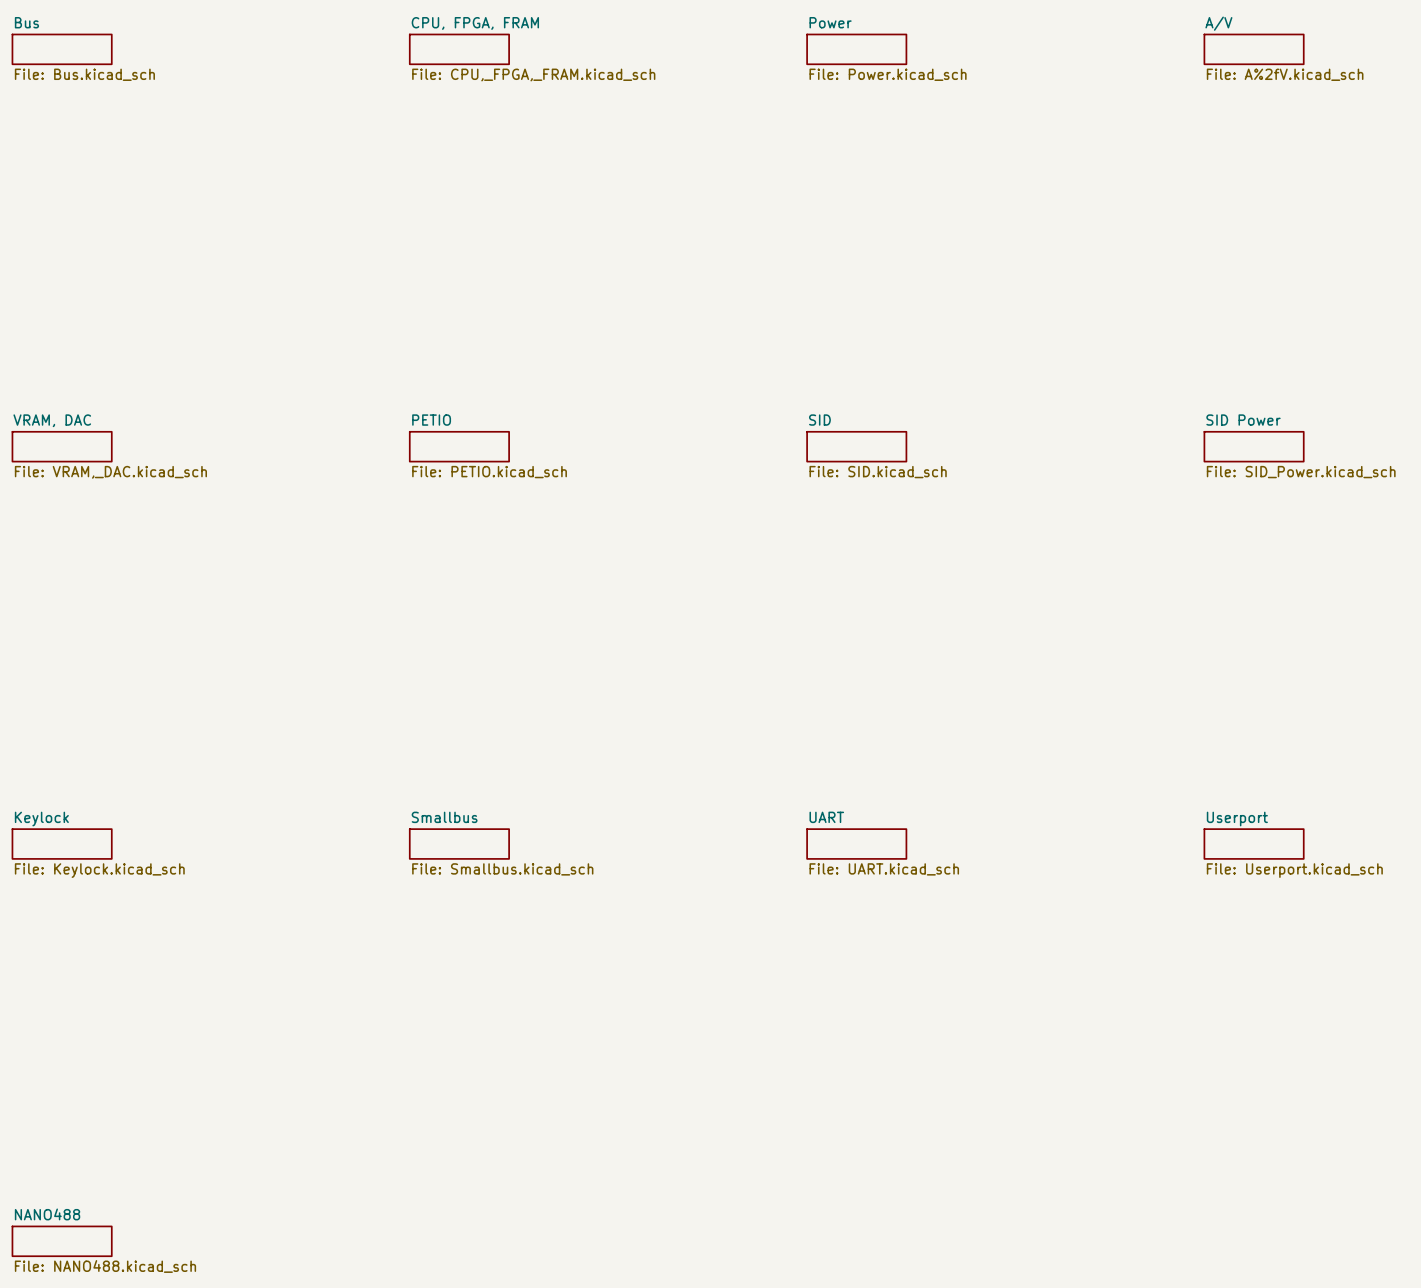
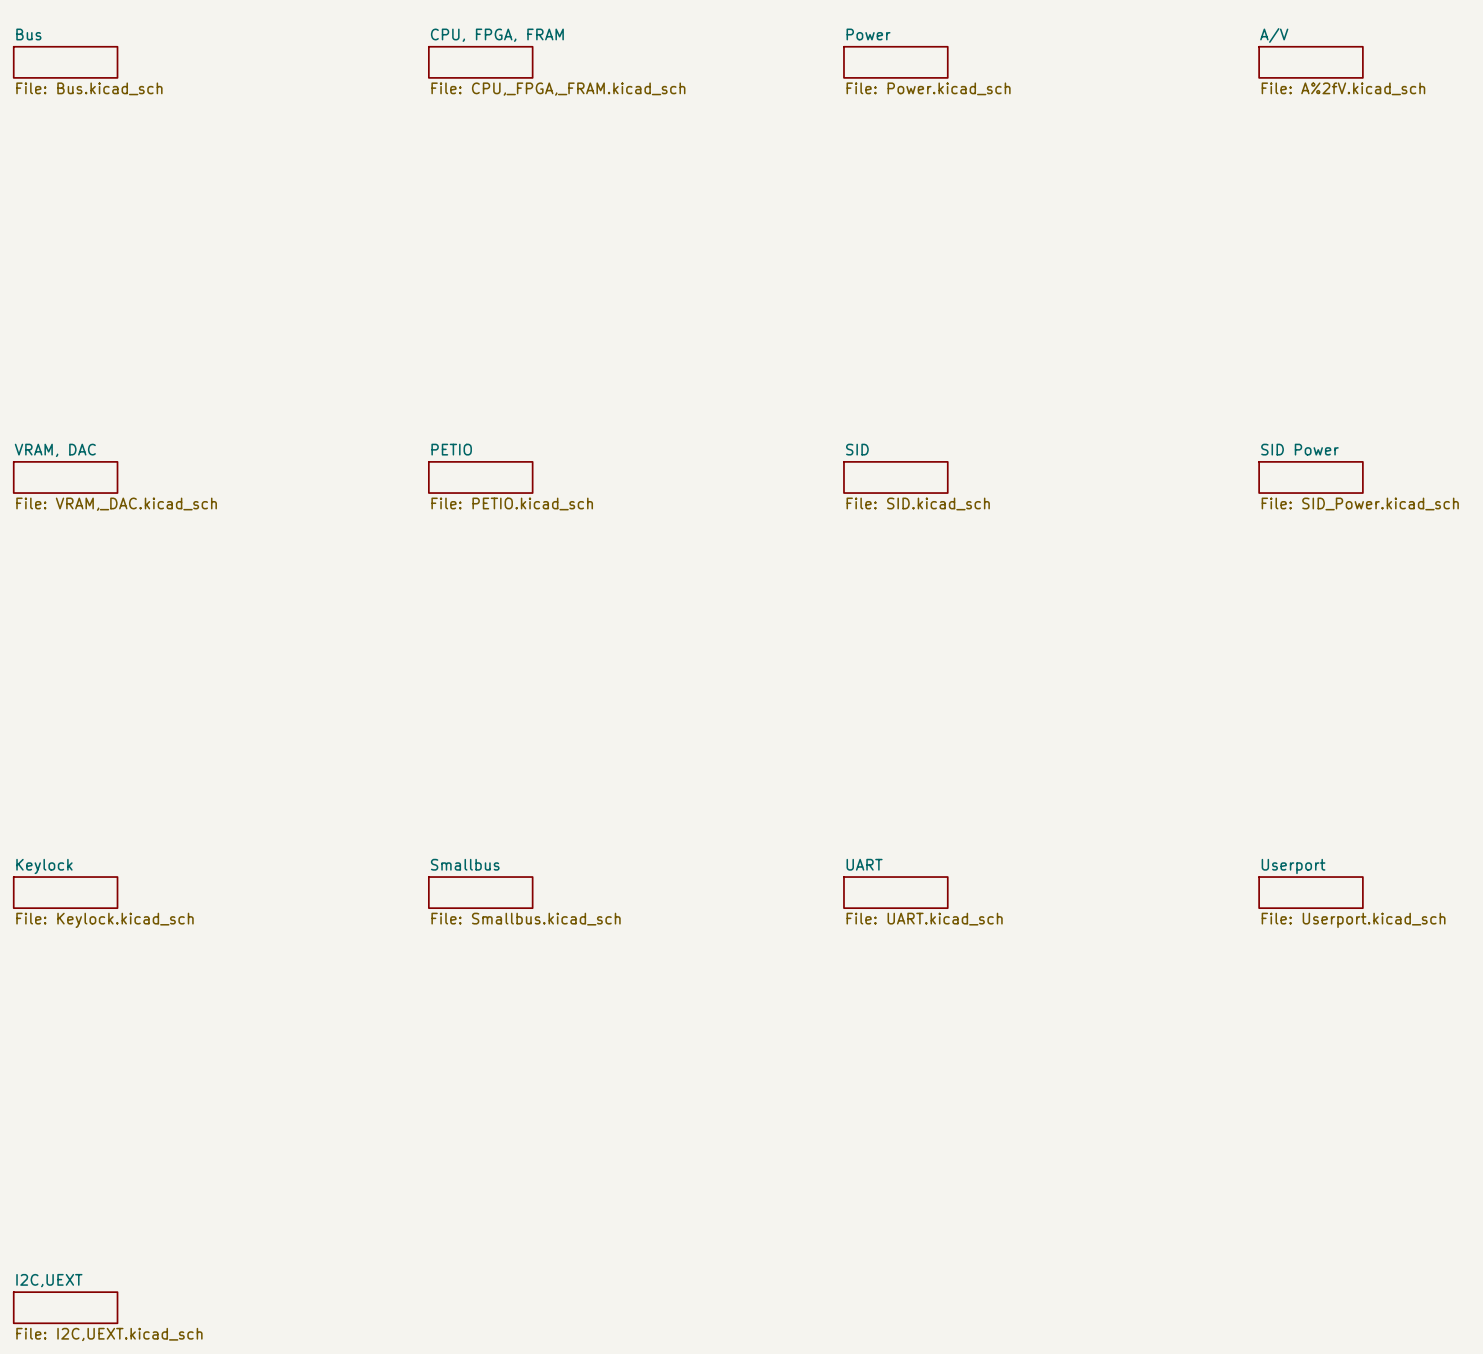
sheet NANO488 name: NANO488 (47, 1214) -> I2C,UEXT (49, 1280)
sheet NANO488 value: File: NANO488.kicad_sch (105, 1266) -> File: I2C,UEXT.kicad_sch (109, 1334)

